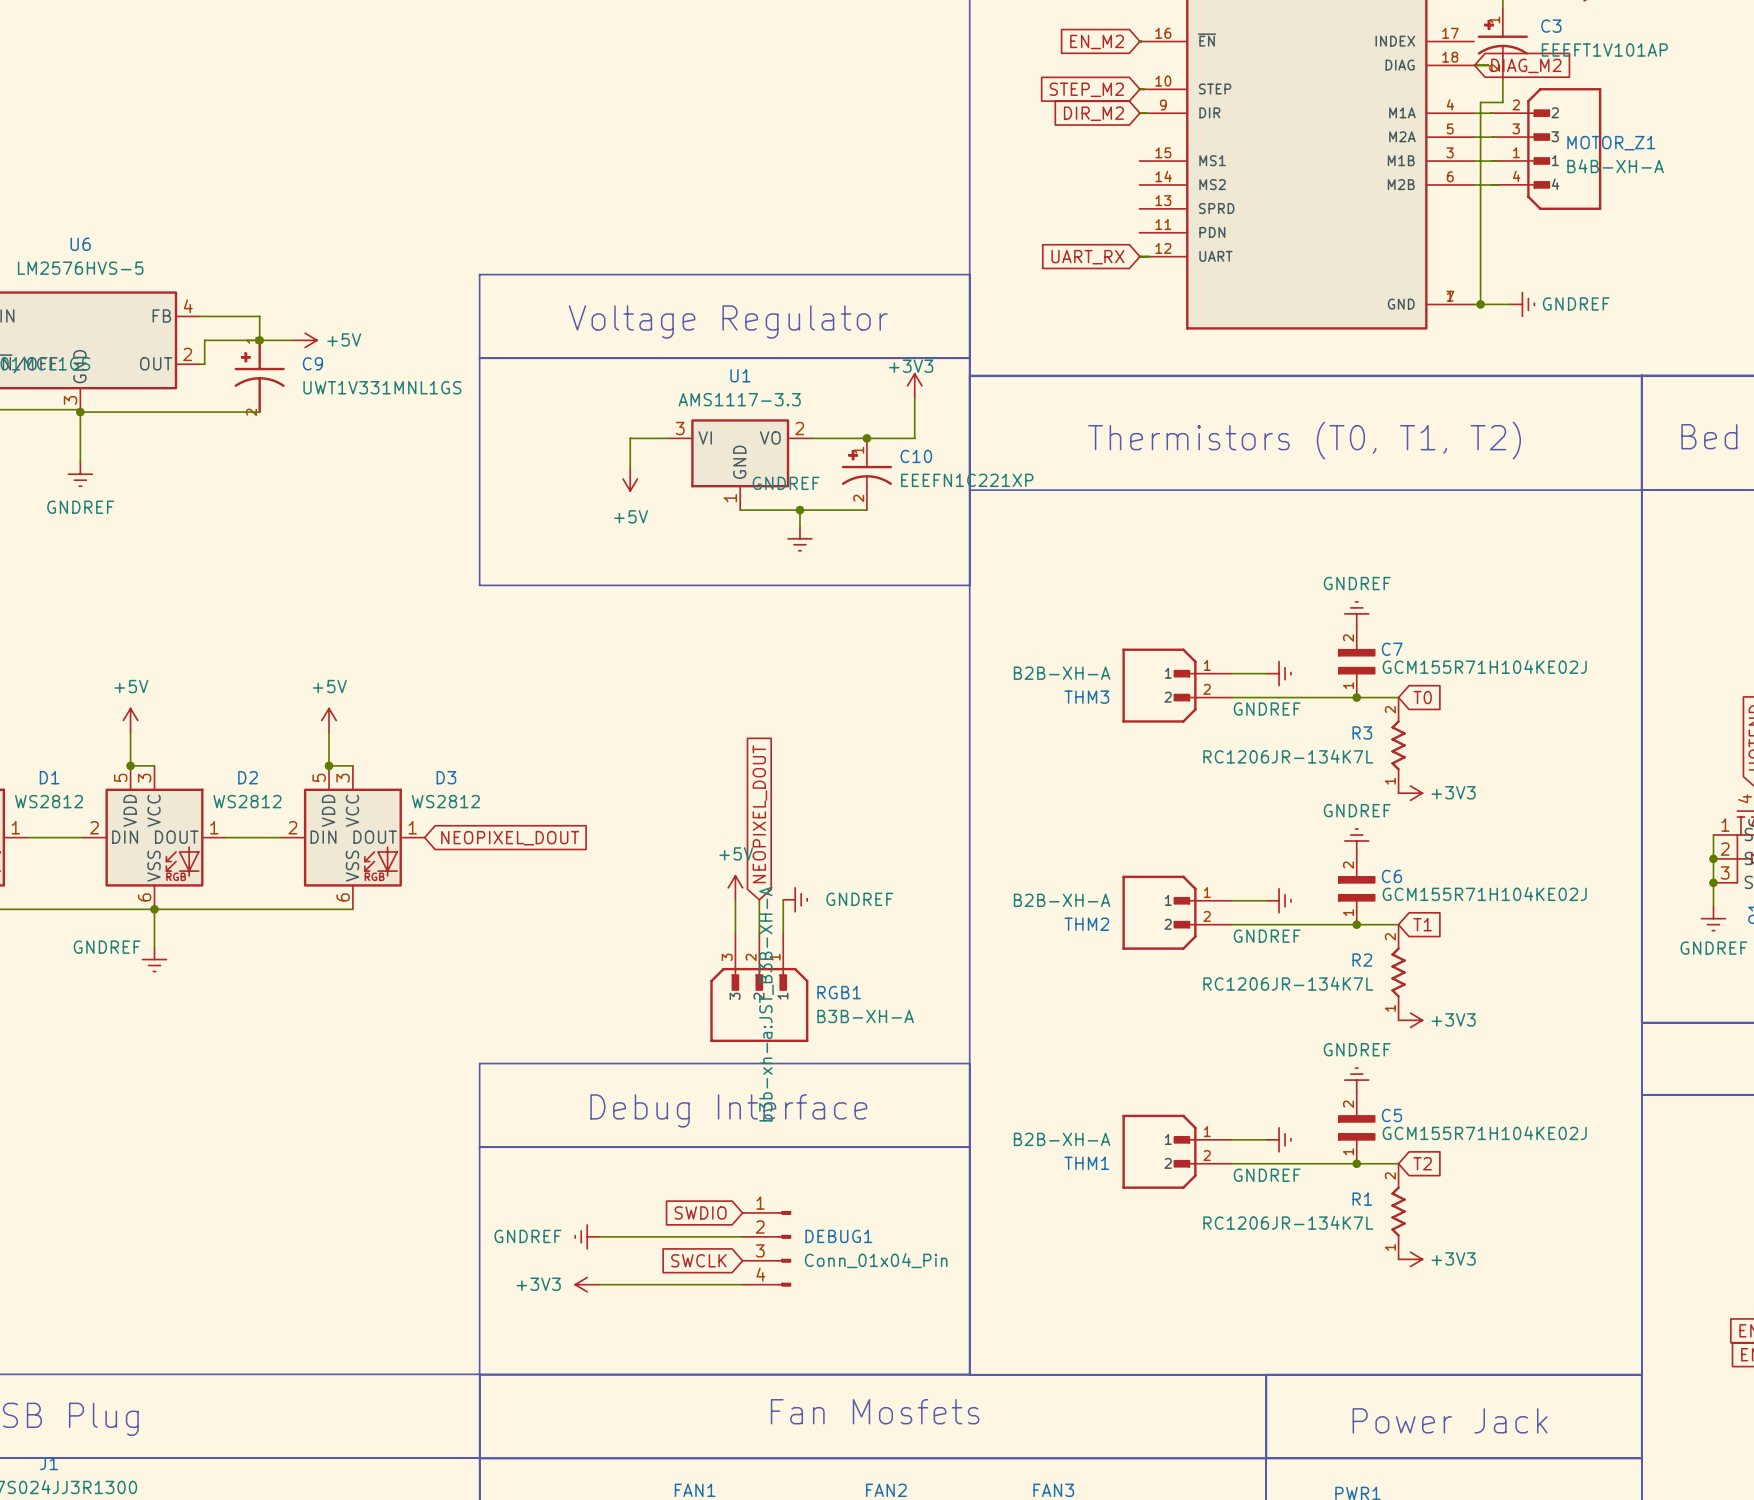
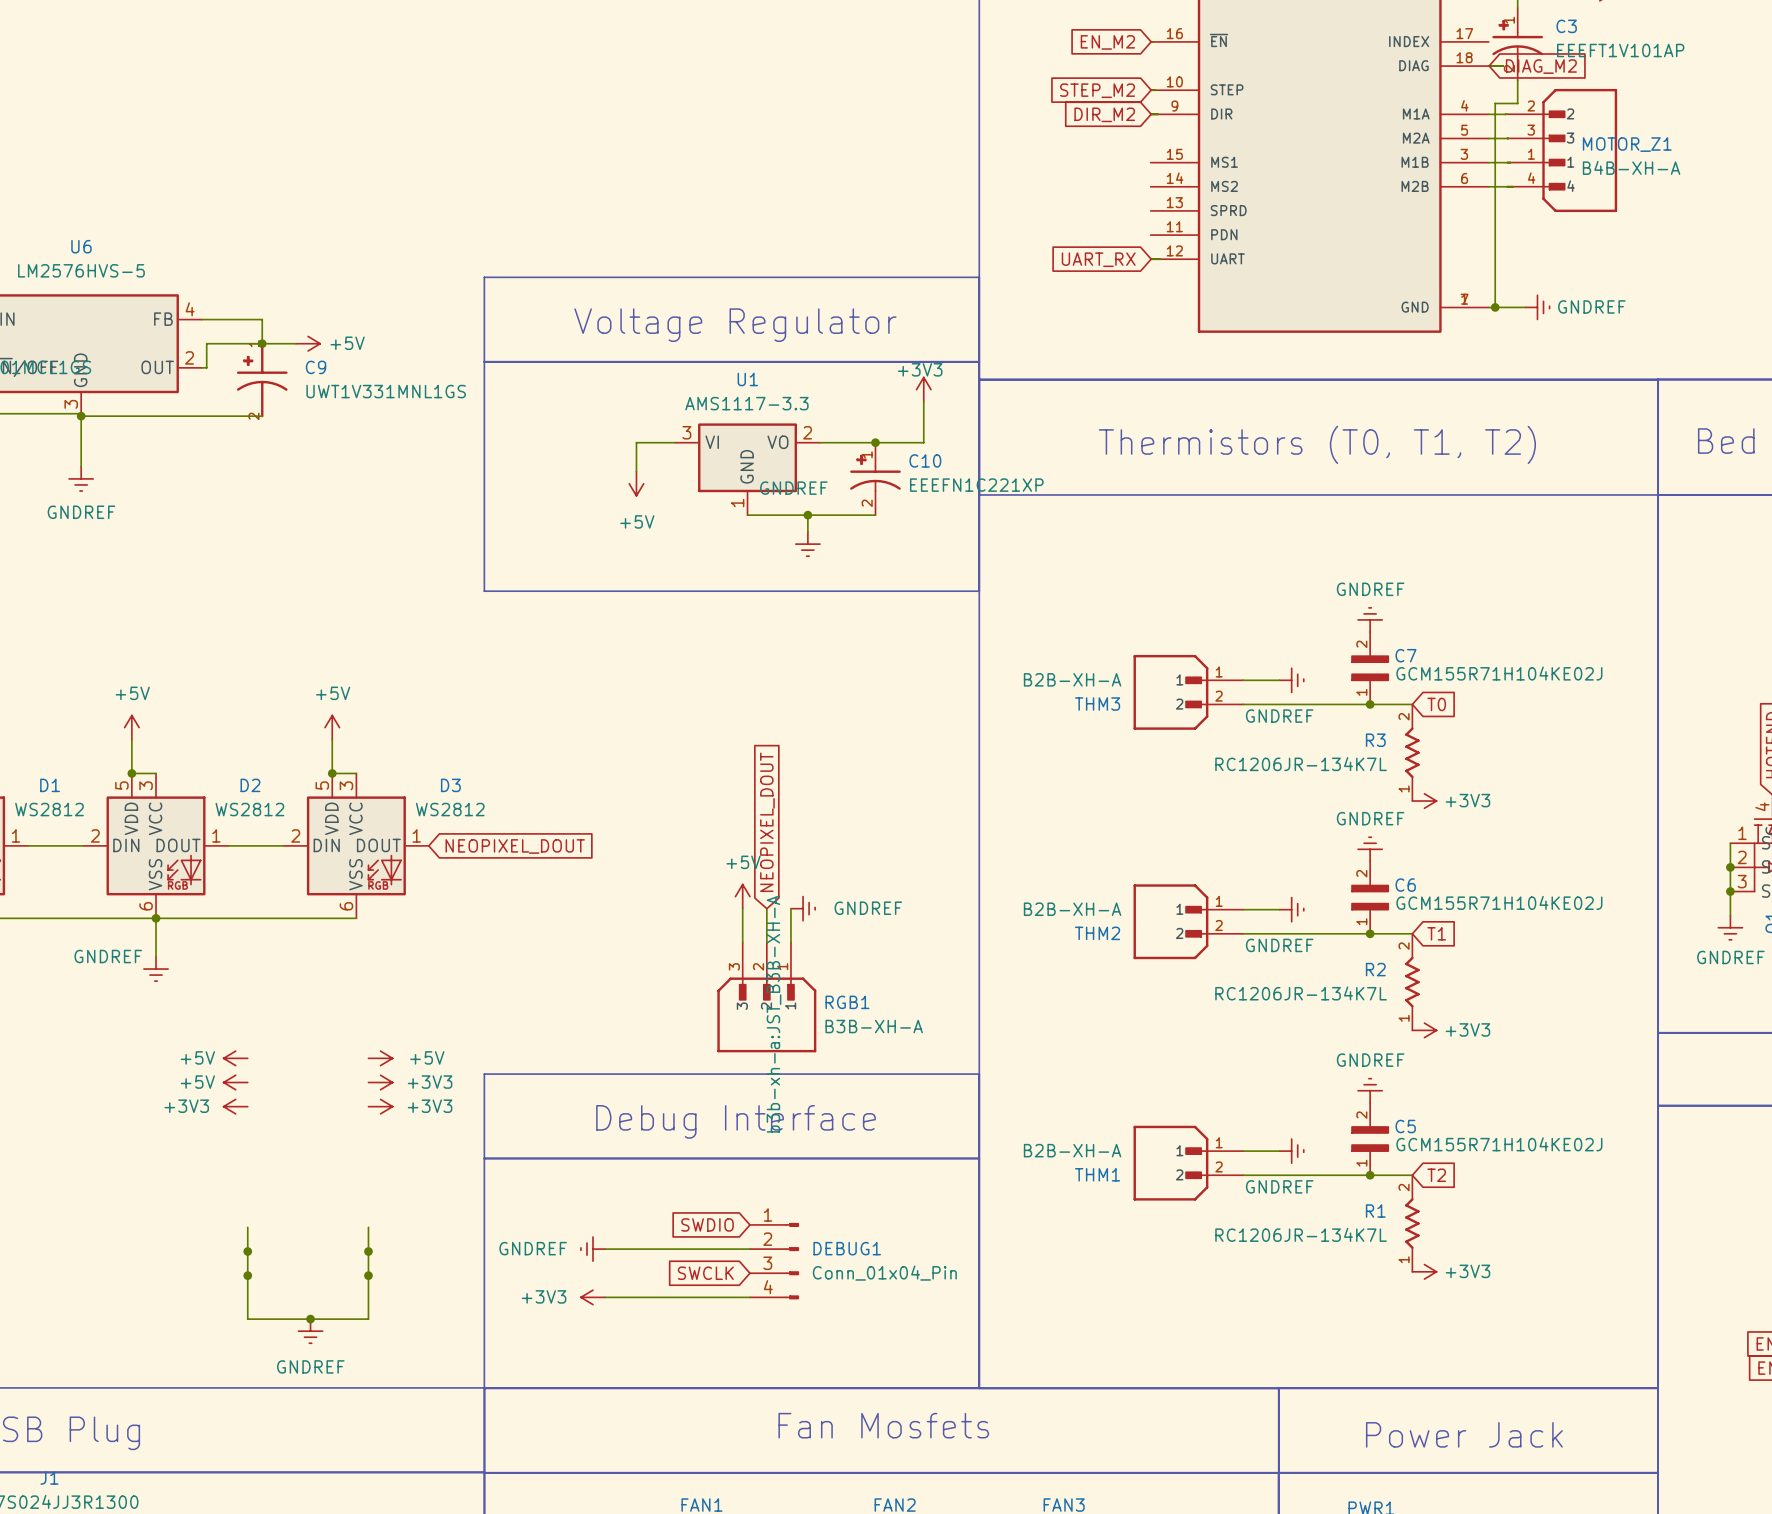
power symbol: none -> +5V (235, 1058)
power symbol: none -> +5V (380, 1058)
power symbol: none -> +5V (235, 1082)
power symbol: none -> +3V3 (380, 1082)
power symbol: none -> +3V3 (235, 1106)
power symbol: none -> +3V3 (380, 1106)
wire: none -> (247, 1227) (247, 1319) (368, 1319) (368, 1227)
junction: none -> (247, 1251)
junction: none -> (368, 1251)
junction: none -> (247, 1275)
junction: none -> (368, 1275)
junction: none -> (310, 1319)
power symbol: none -> GNDREF (310, 1331)

